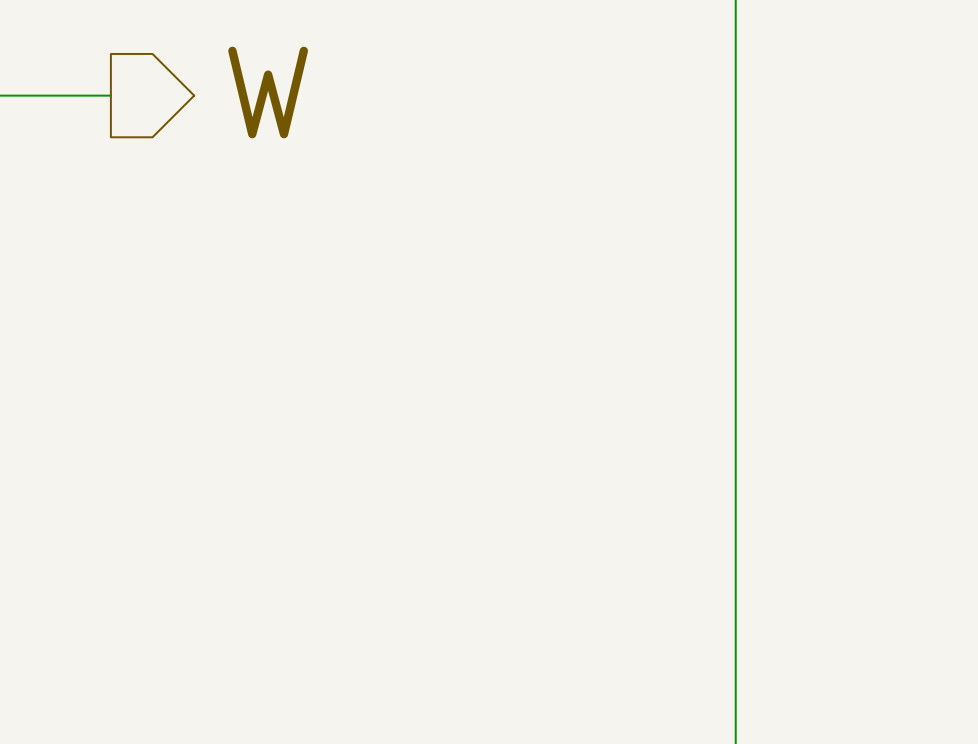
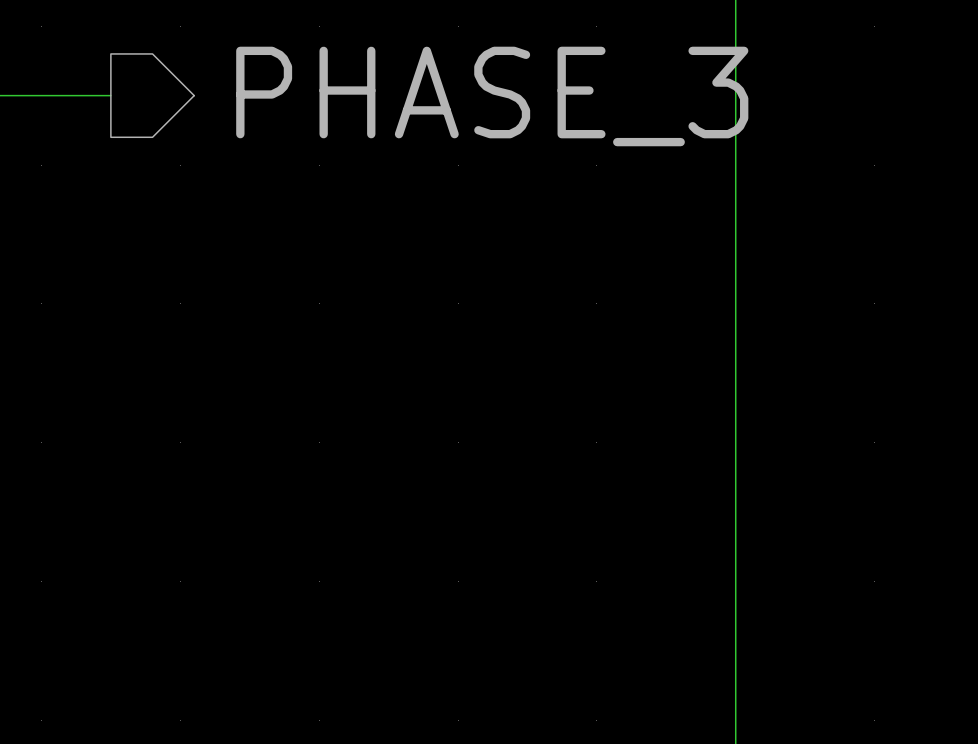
hierarchical label: W (268, 92) -> PHASE_3 (492, 96)

